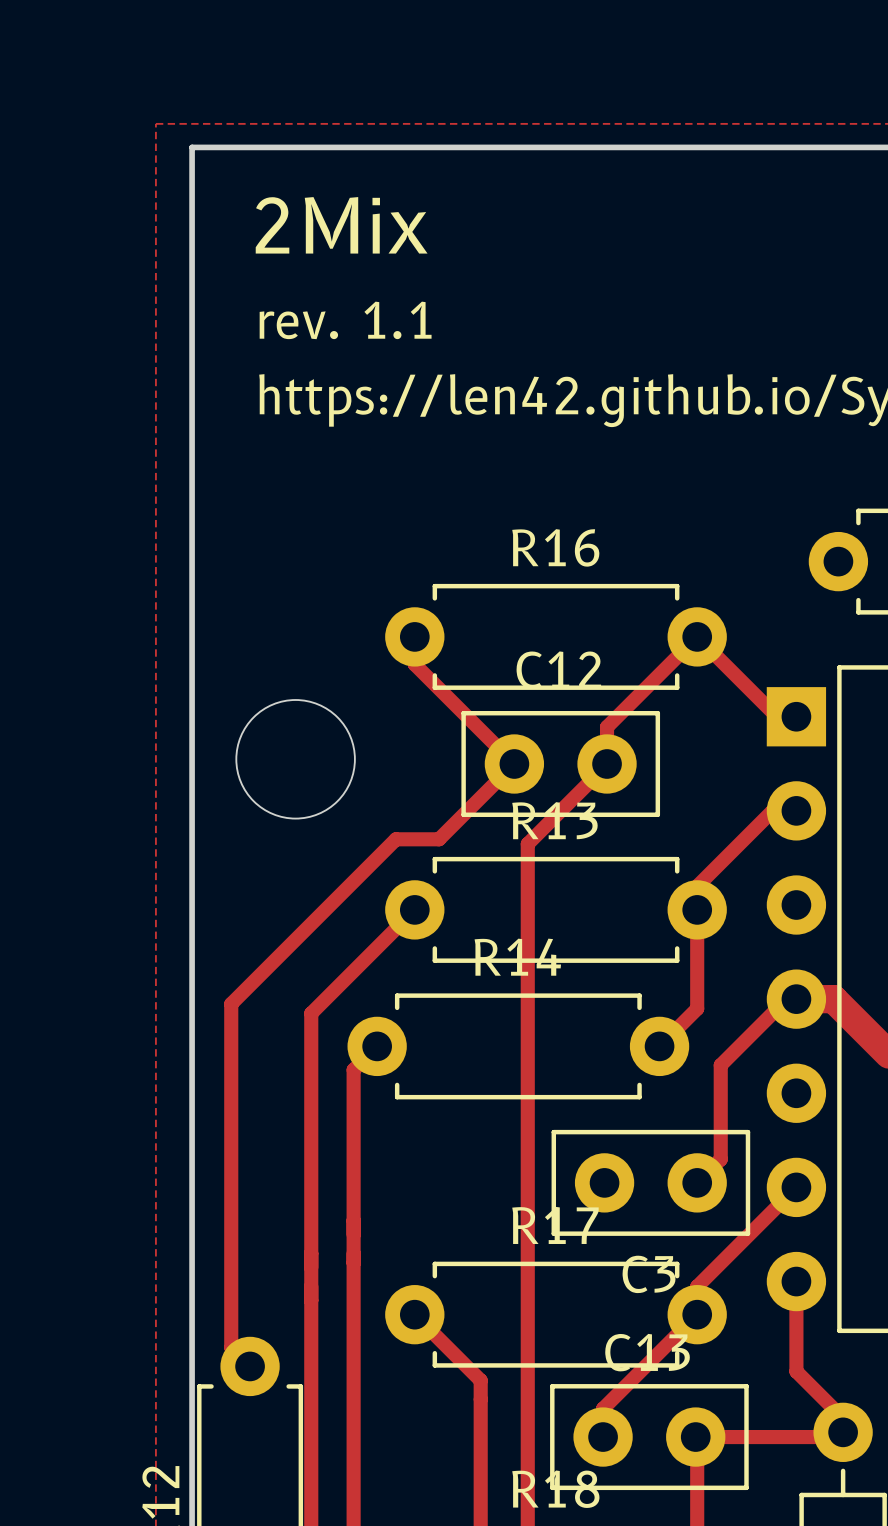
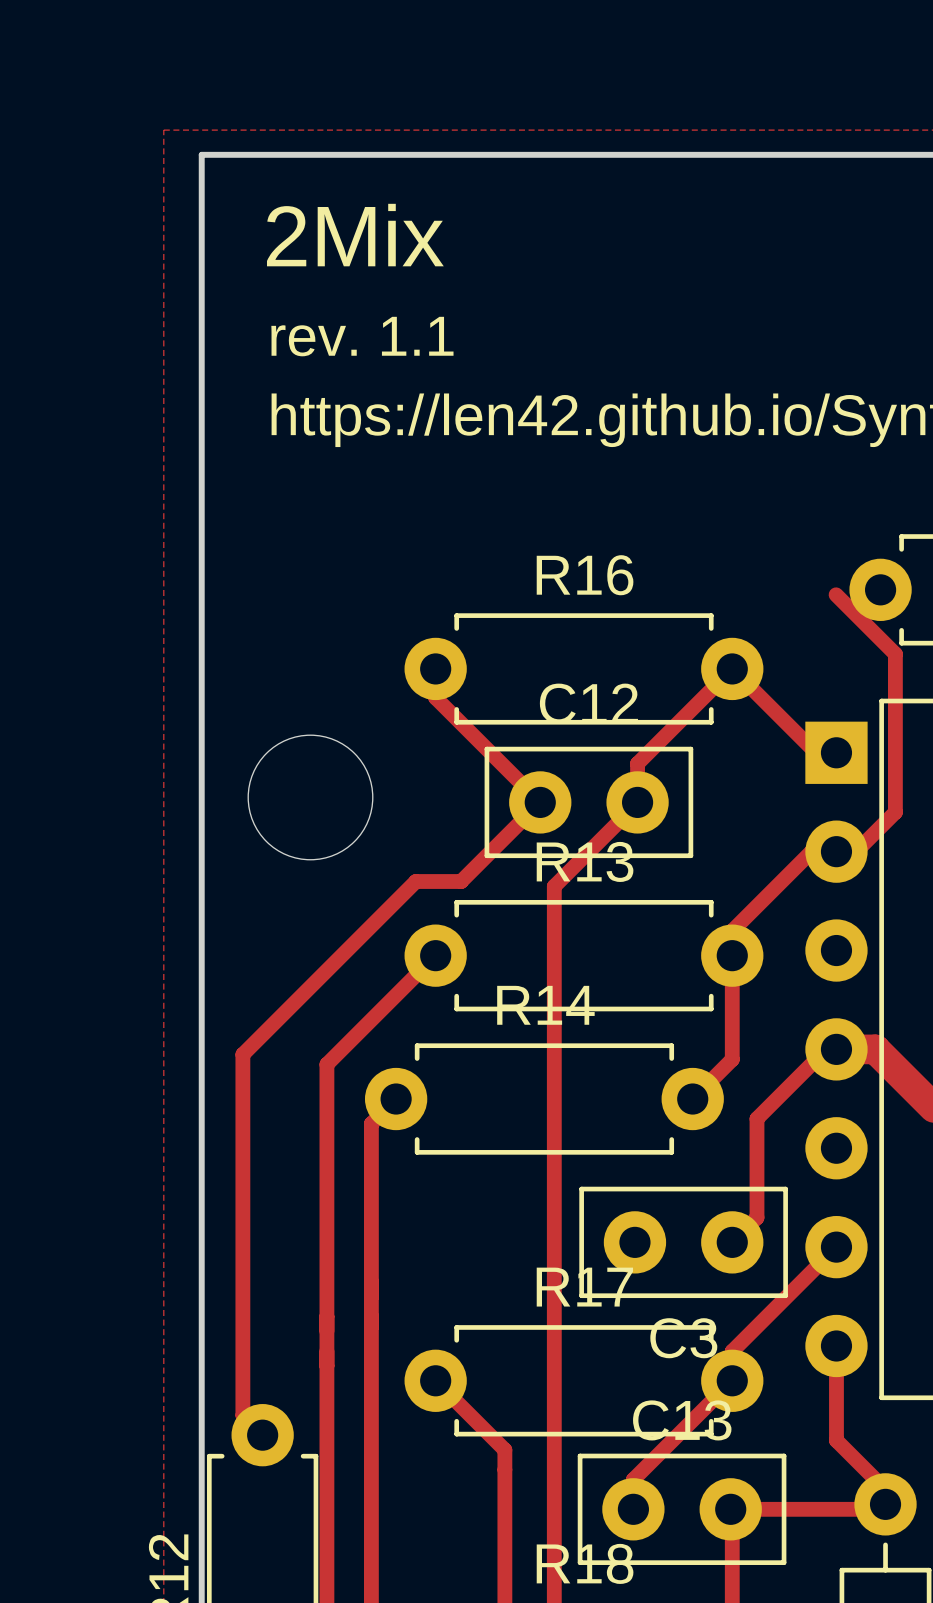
track: none -> (836, 594) (895, 654) (895, 812) (855, 851) (836, 851)

